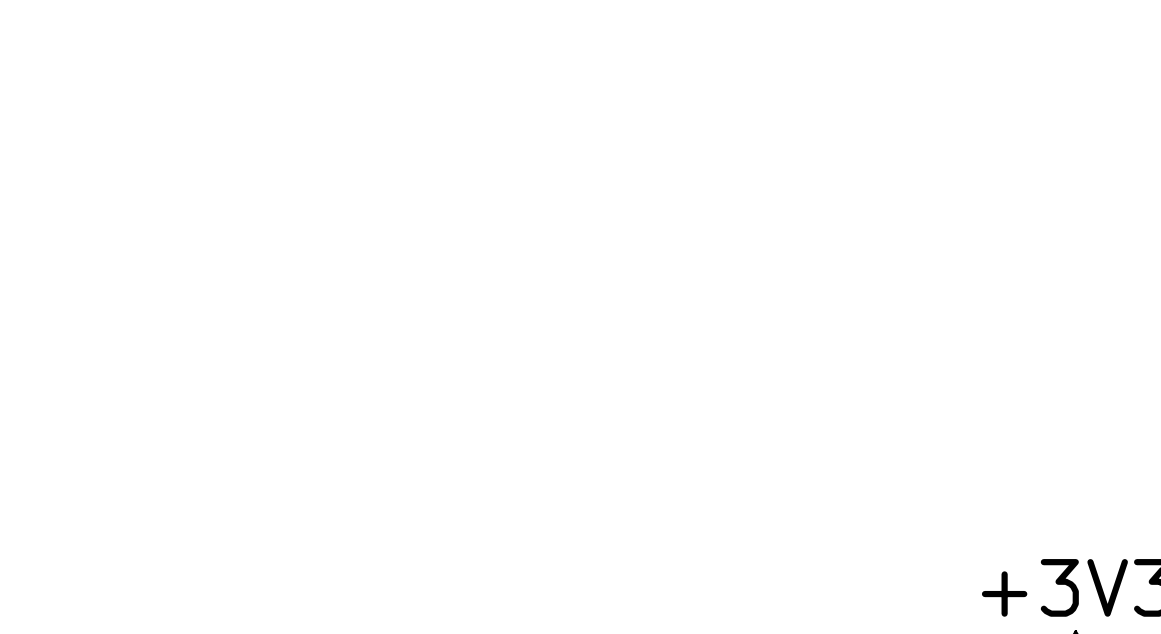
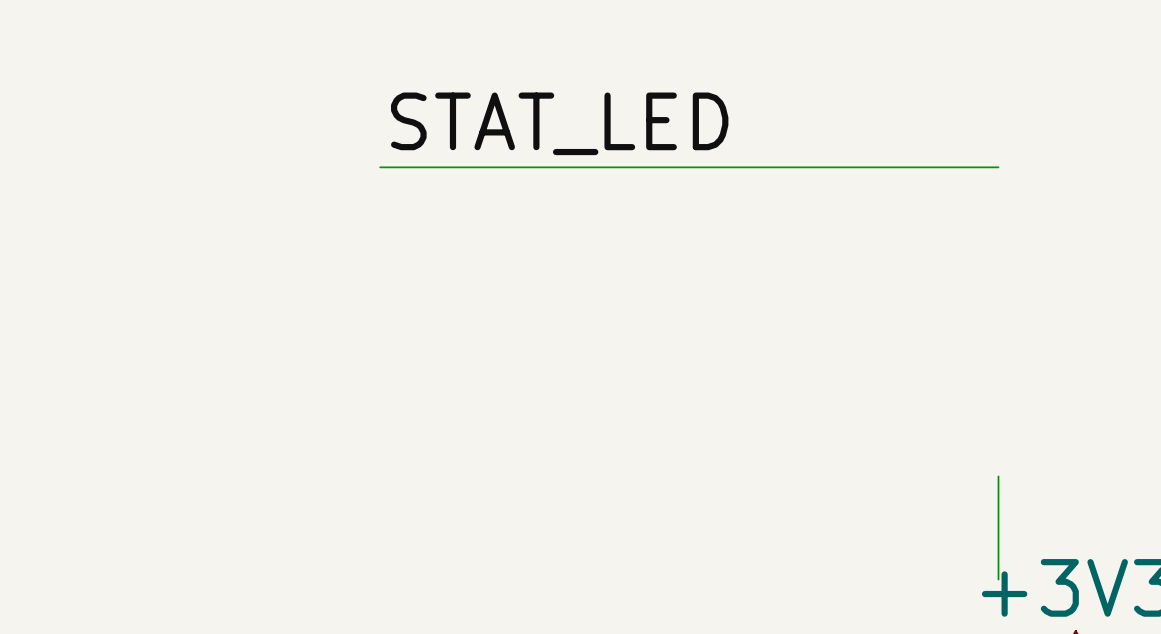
label: none -> STAT_LED (559, 123)
wire: none -> (380, 167) (998, 167)
wire: none -> (998, 476) (998, 579)

